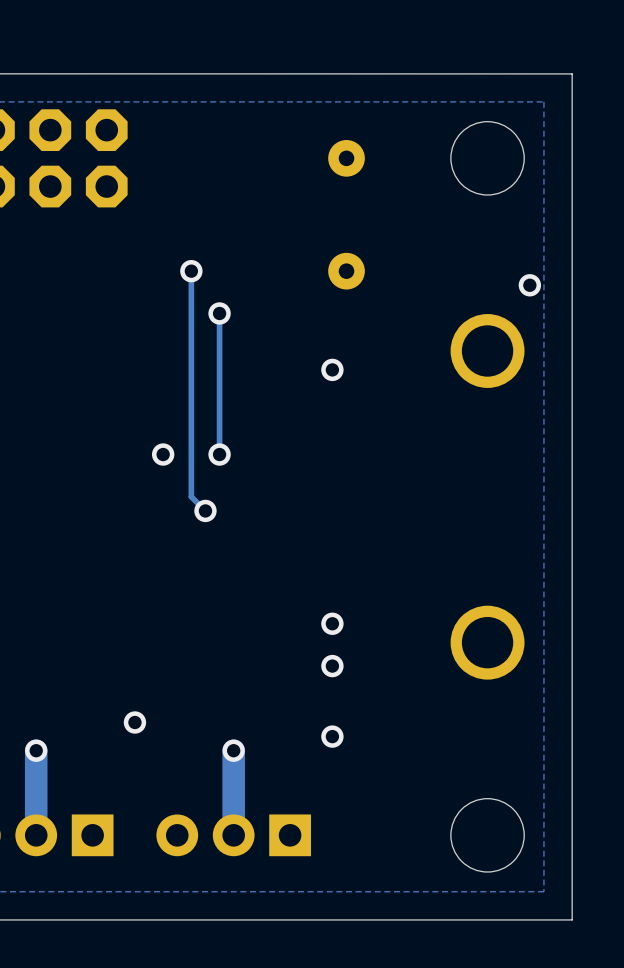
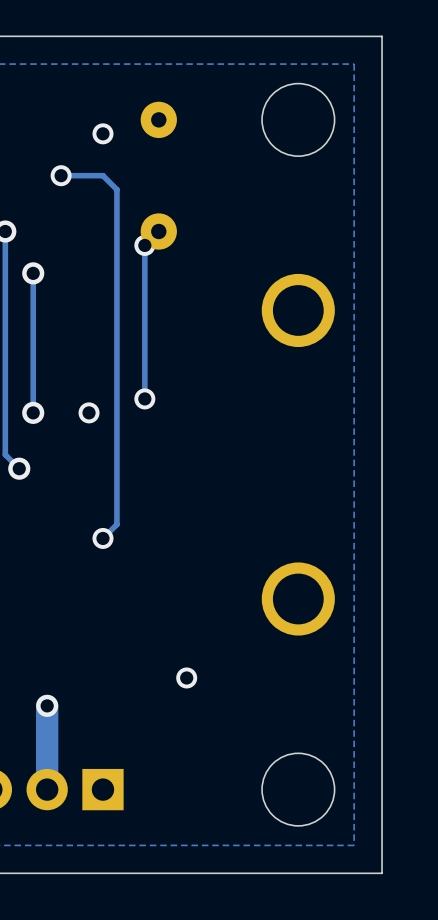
via: none -> (102, 133)
track: none -> (61, 175) (102, 175) (116, 189) (116, 524) (102, 538)
via: none -> (61, 175)
track: none -> (144, 245) (144, 398)
via: none -> (144, 245)
via: (529, 285) -> none
via: (332, 369) -> none
via: none -> (144, 398)
via: none -> (89, 412)
via: none -> (102, 538)
via: (332, 623) -> none
via: (332, 666) -> none
via: none -> (186, 677)
via: (332, 736) -> none

